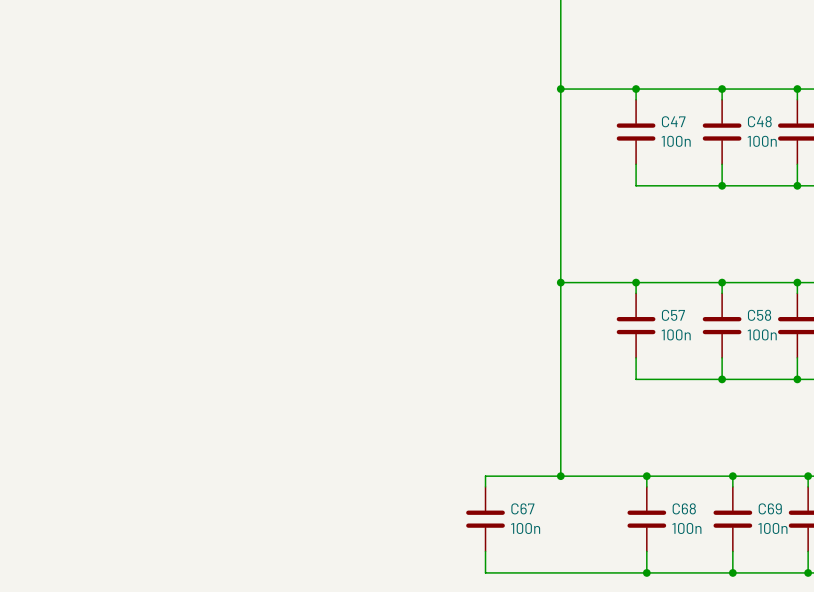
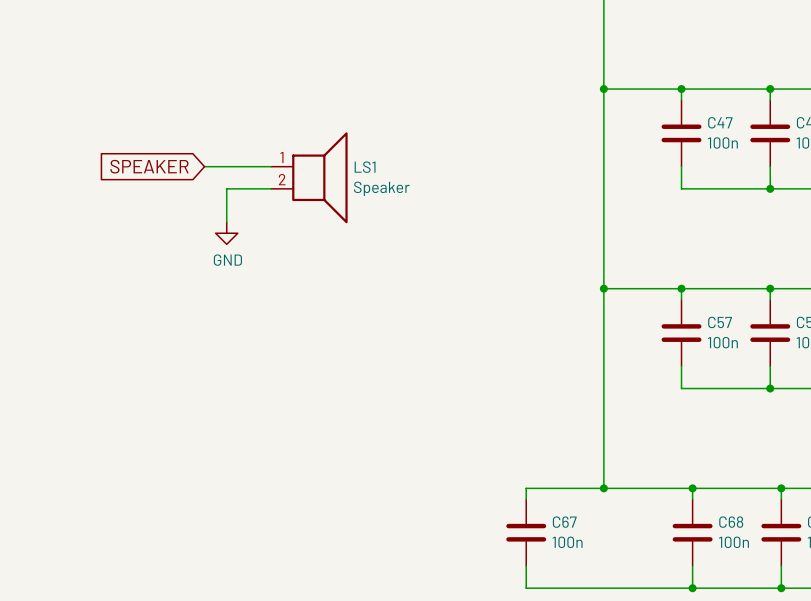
global label: none -> SPEAKER (149, 166)
wire: none -> (204, 166) (271, 166)
LS1: none -> Speaker (309, 177)
wire: none -> (271, 188) (226, 188) (226, 222)
power symbol: none -> GND (226, 233)

